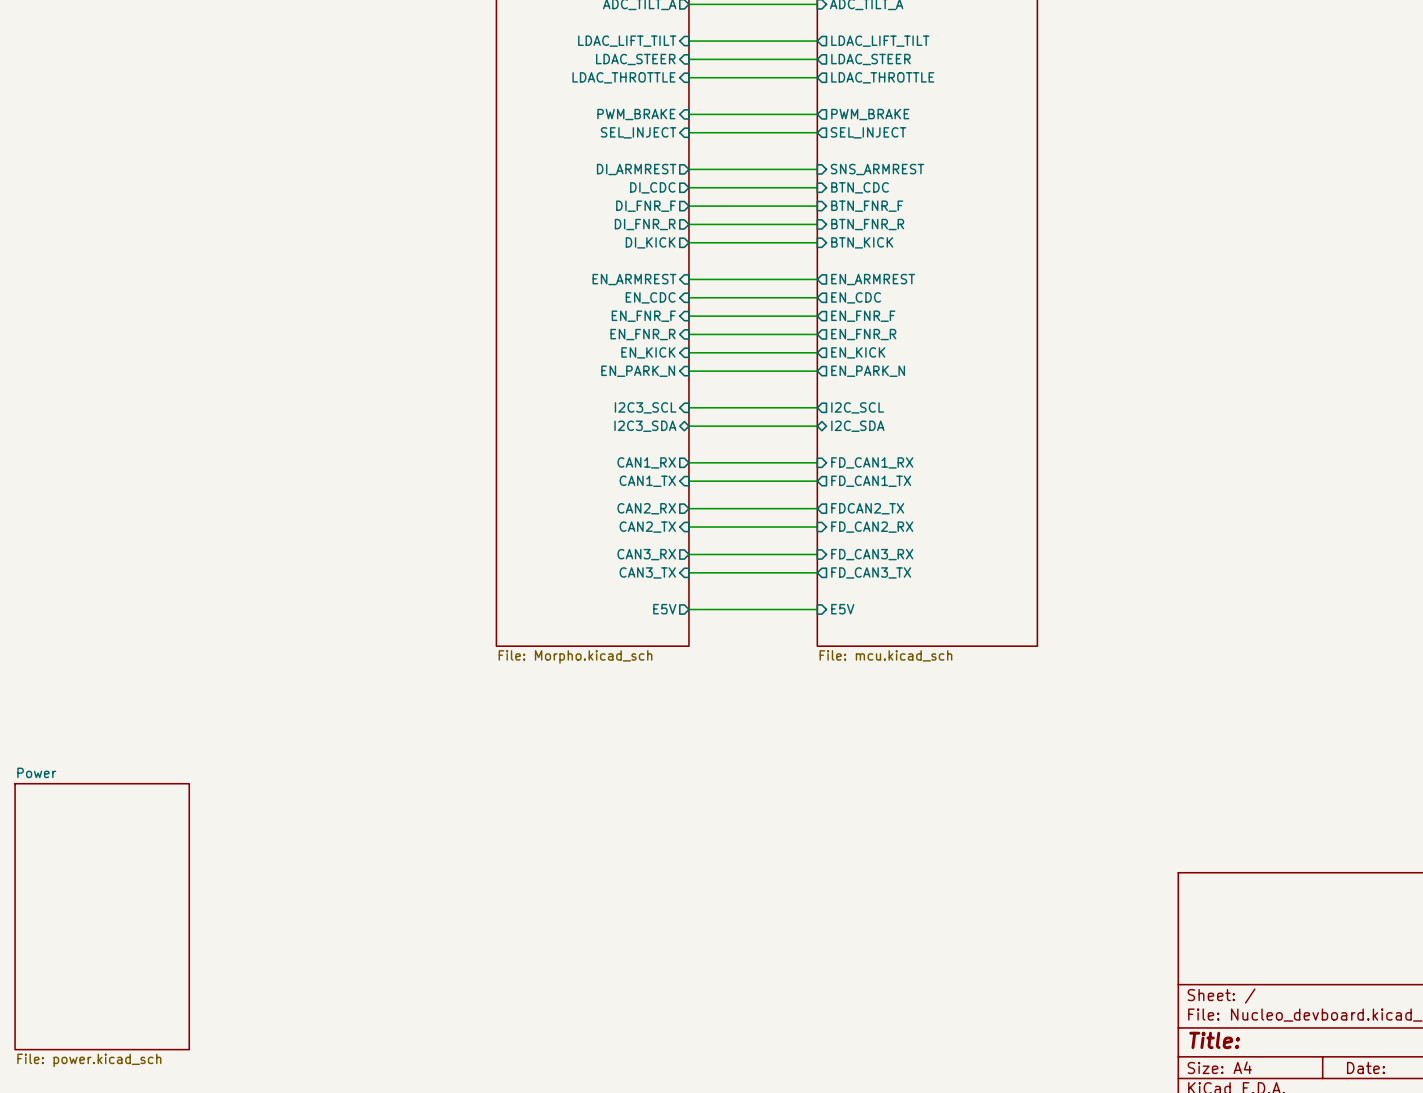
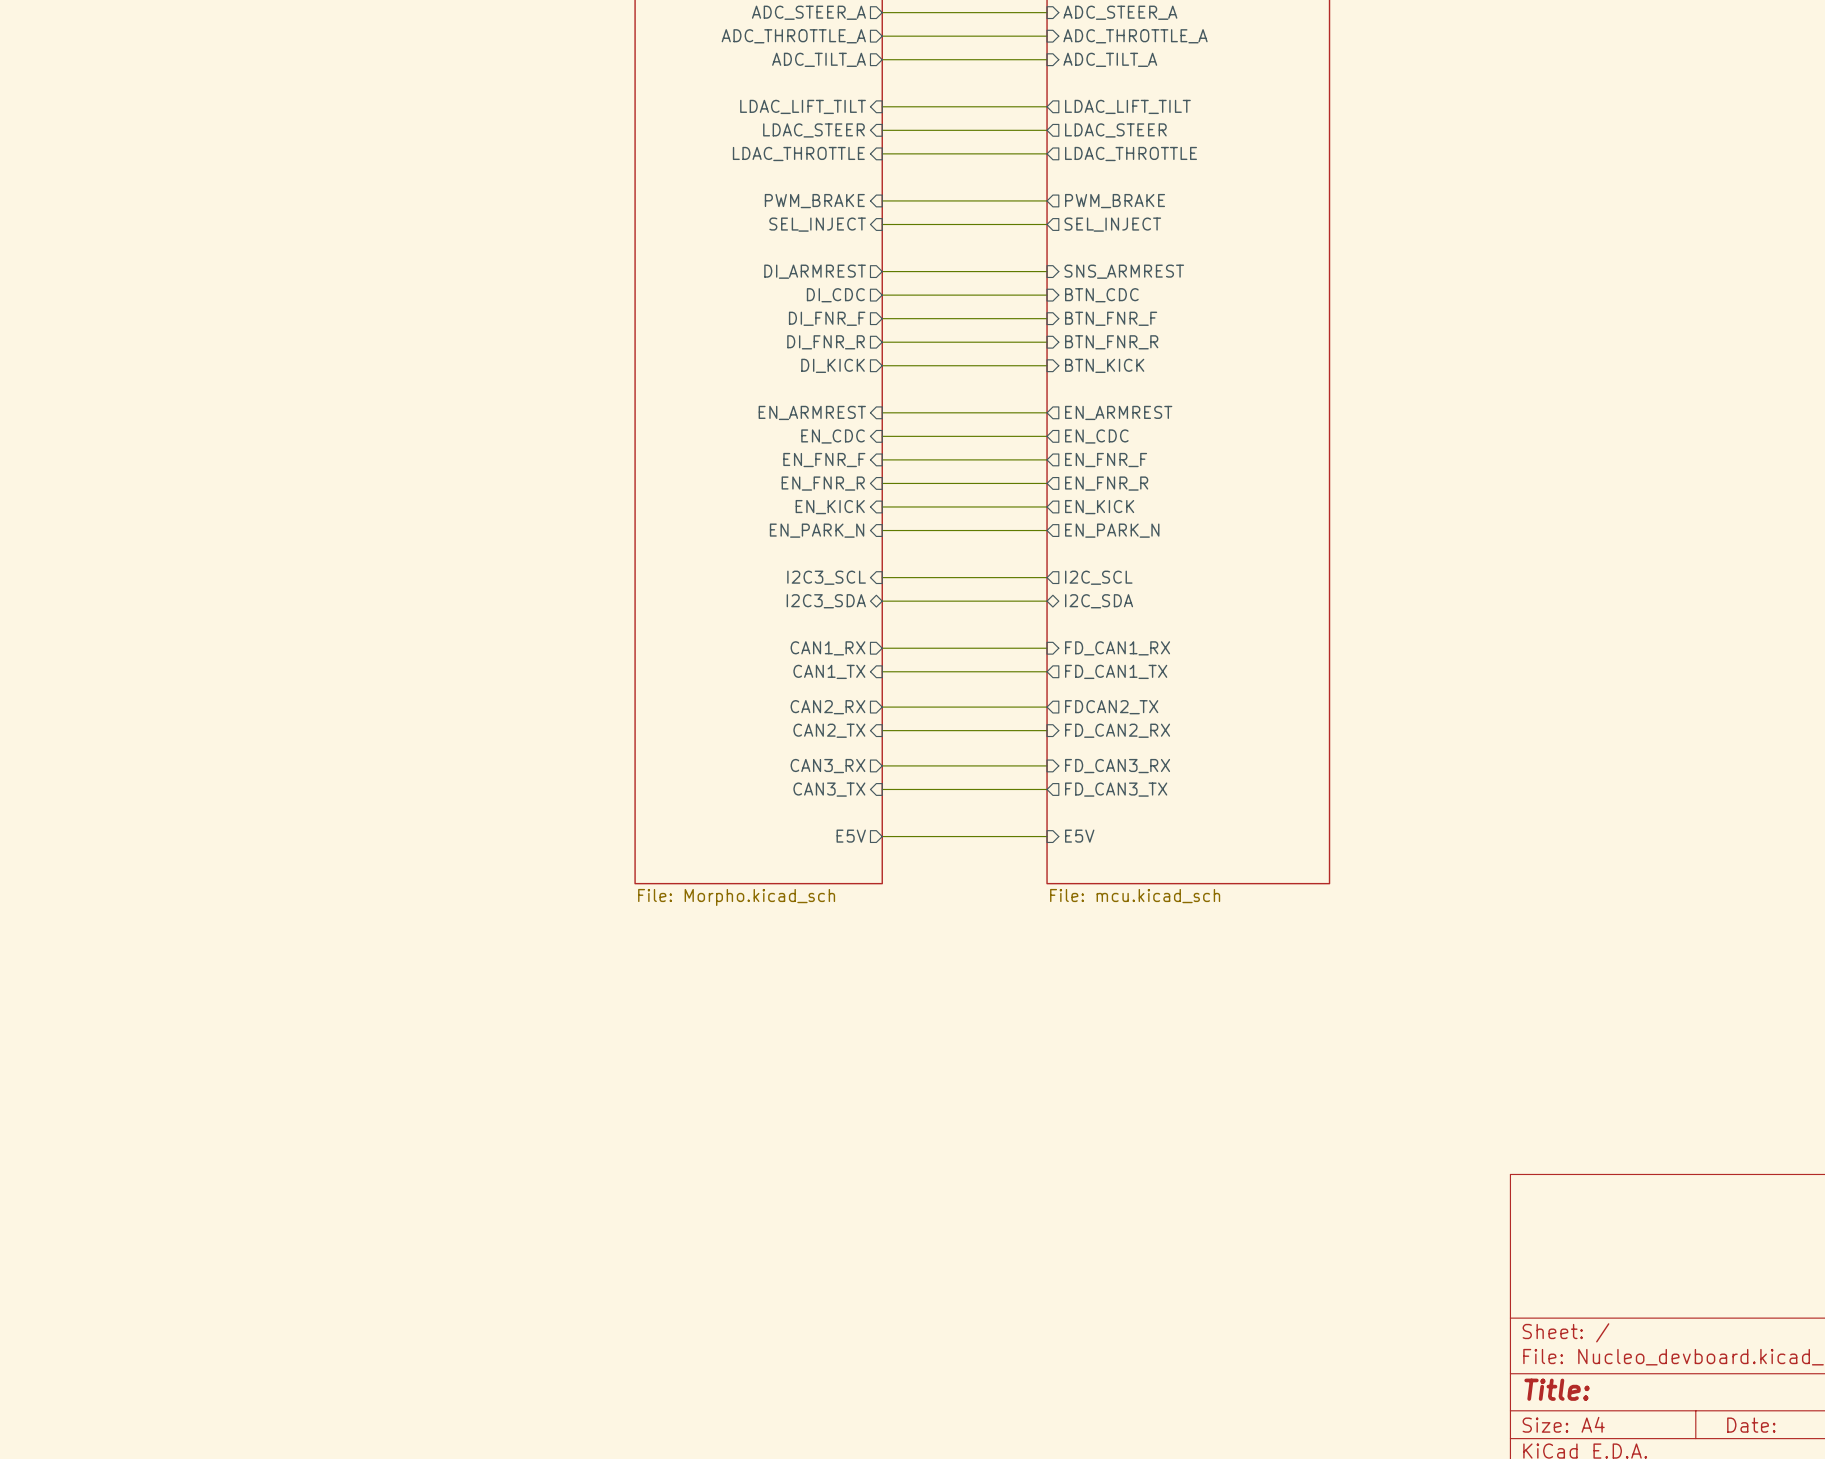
sheet Power: File: power.kicad_sch (102, 916) -> none

